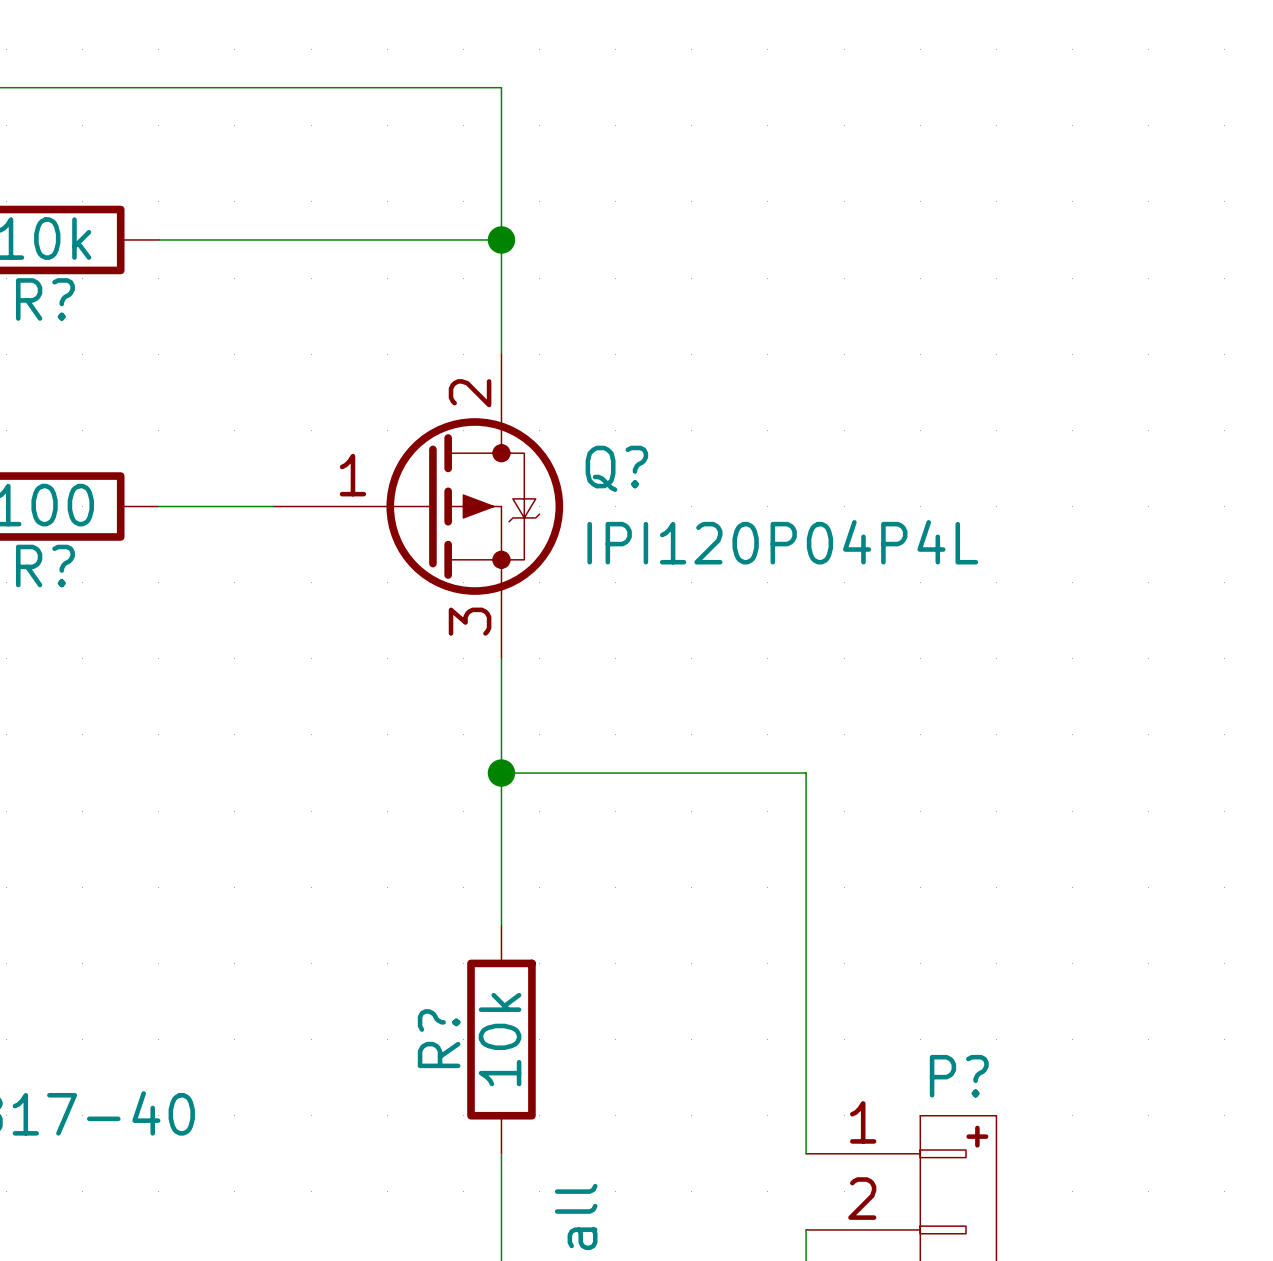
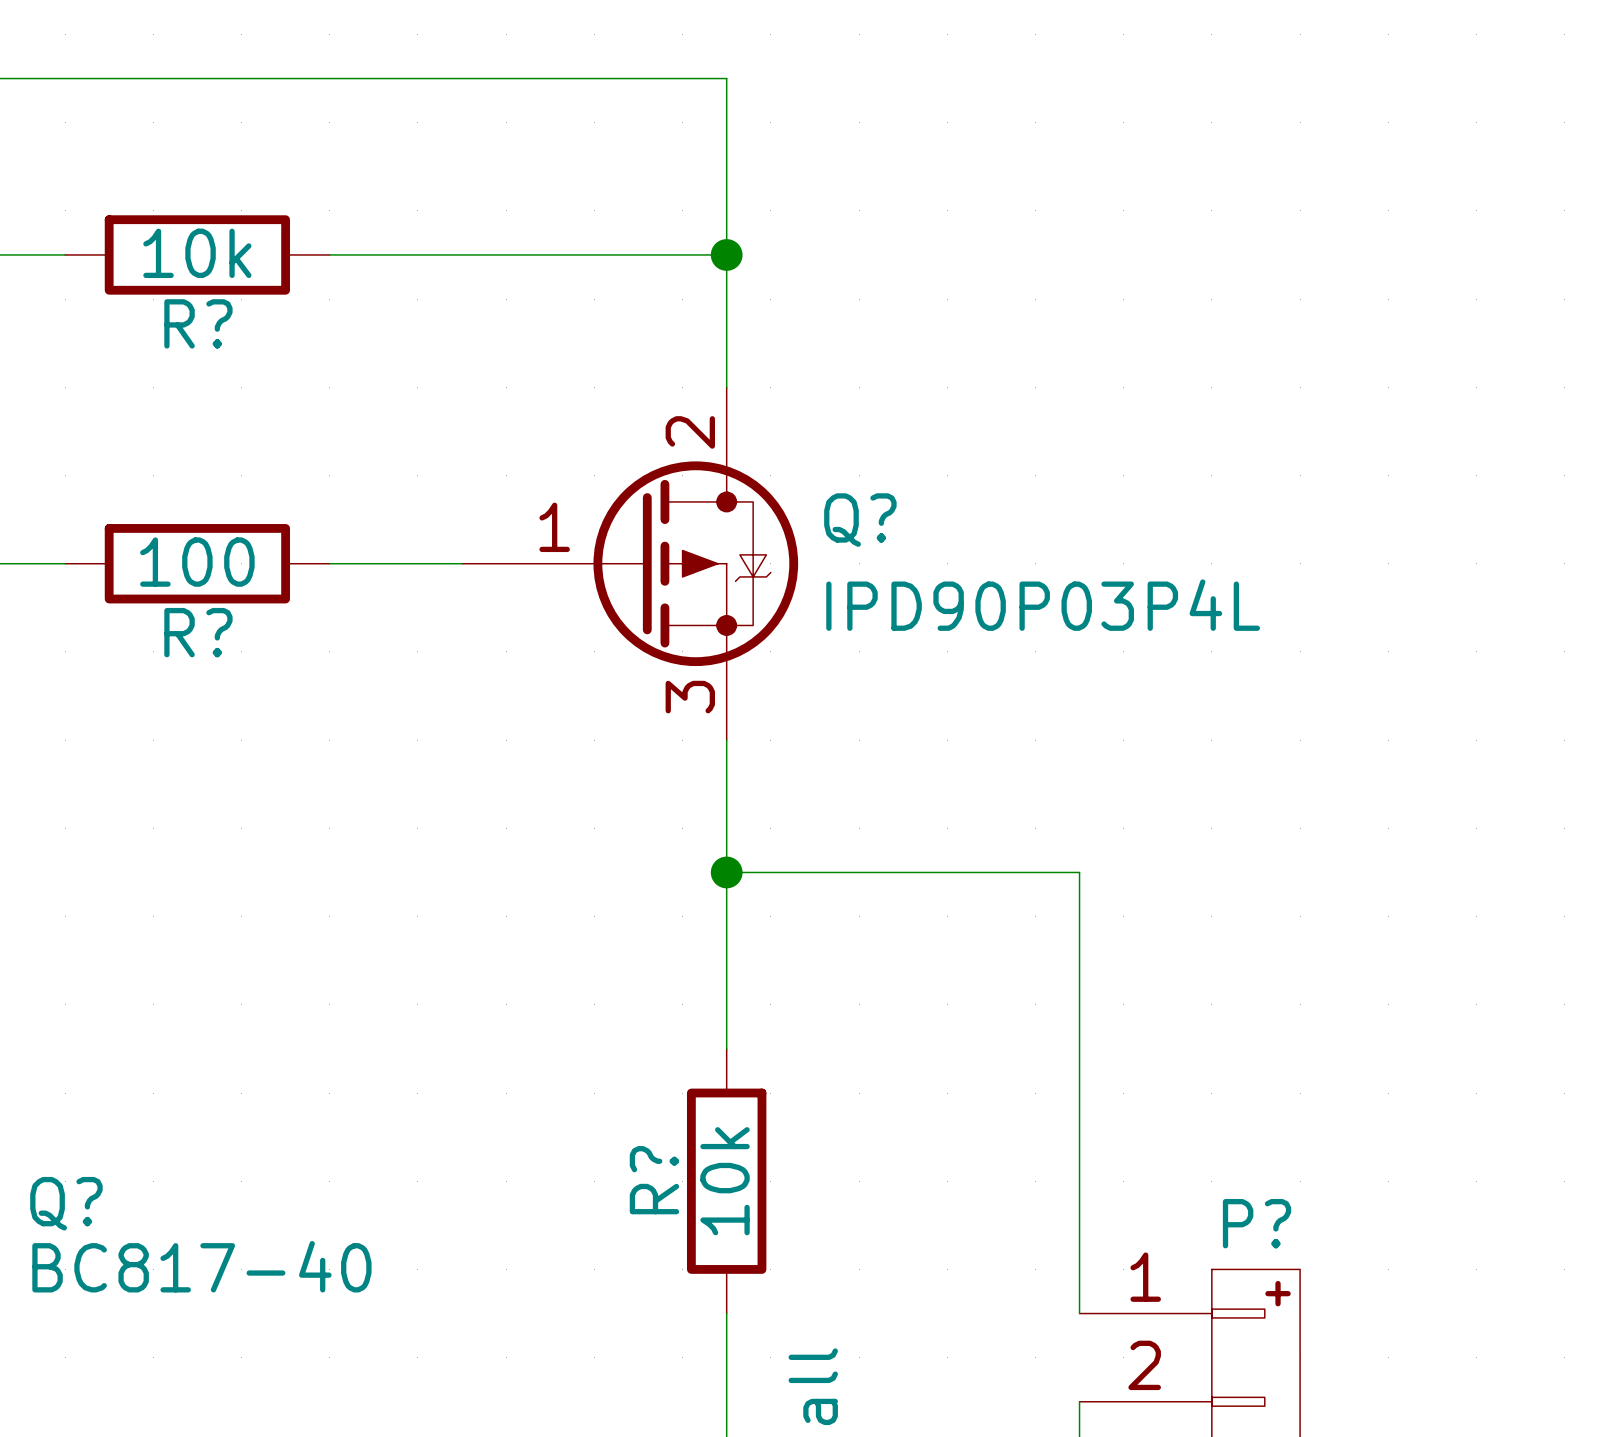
Q? value: IPI120P04P4L (782, 542) -> IPD90P03P4L (1043, 605)

